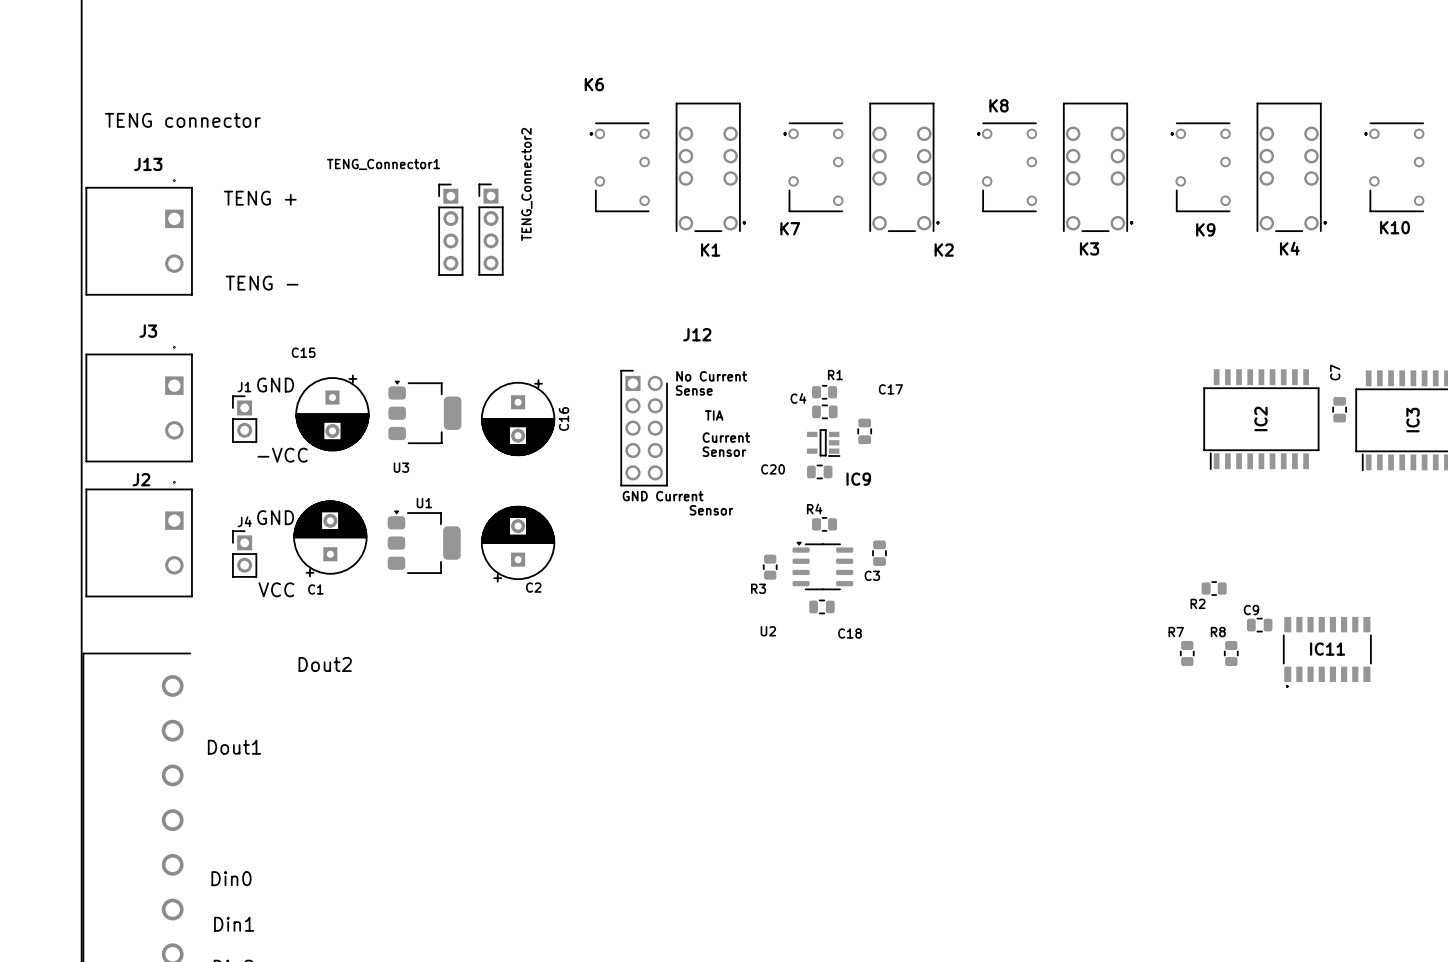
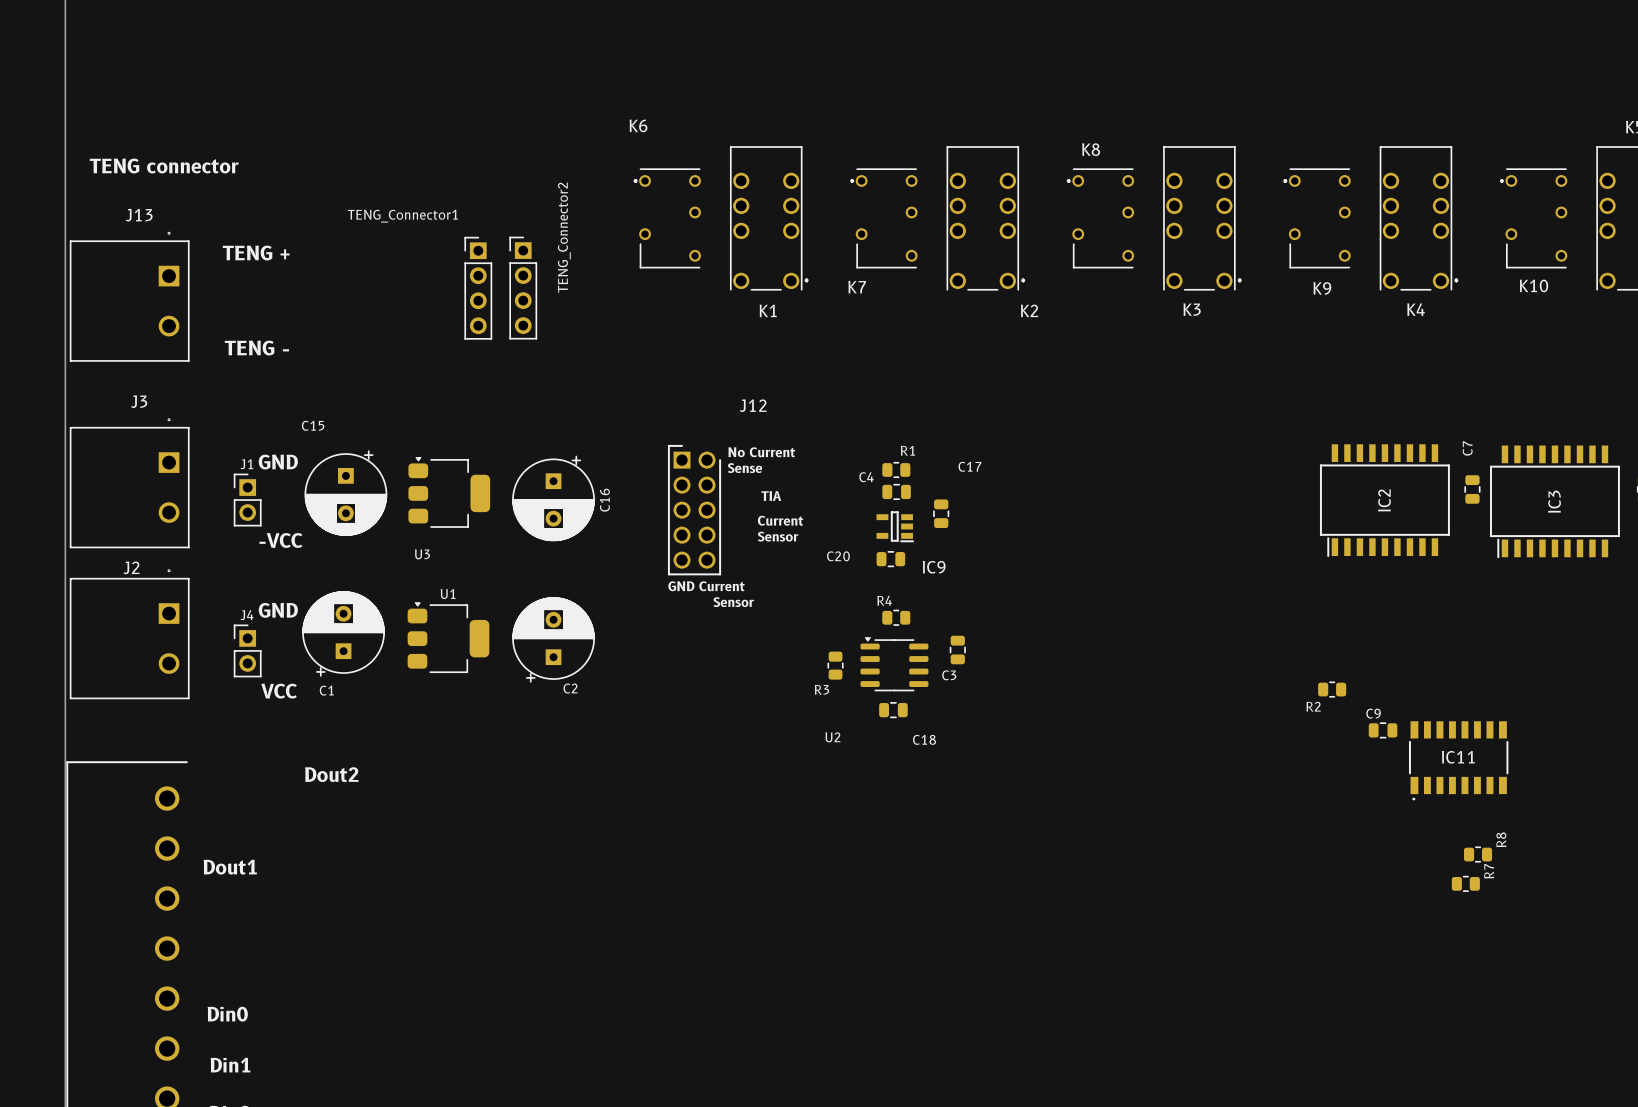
R7 rotation: 0° (1187, 653) -> 90° clockwise (1465, 883)
R7 position: (1187, 653) -> (1465, 883)
R8 rotation: 0° (1231, 653) -> 90° clockwise (1478, 854)
R8 position: (1231, 653) -> (1478, 854)

